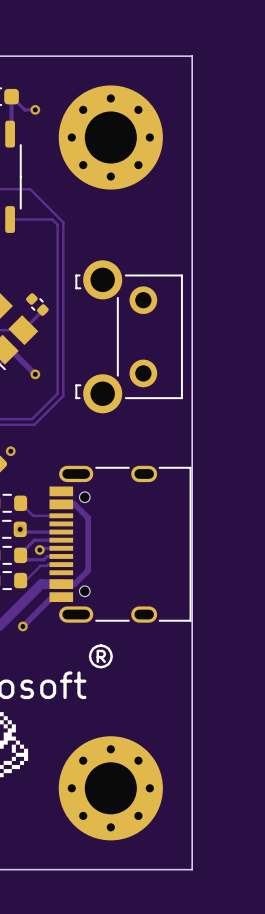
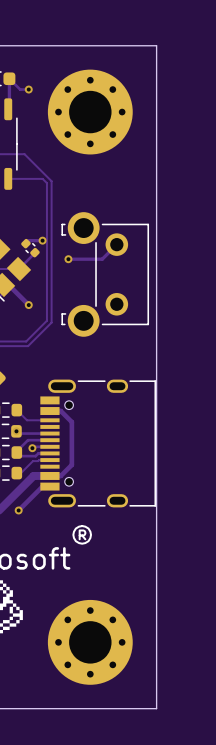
track: none -> (42, 240) (28, 240) (25, 243)
via: none -> (42, 240)
track: none -> (116, 244) (102, 259) (68, 259)
via: none -> (68, 259)
via: (10, 451) -> none

